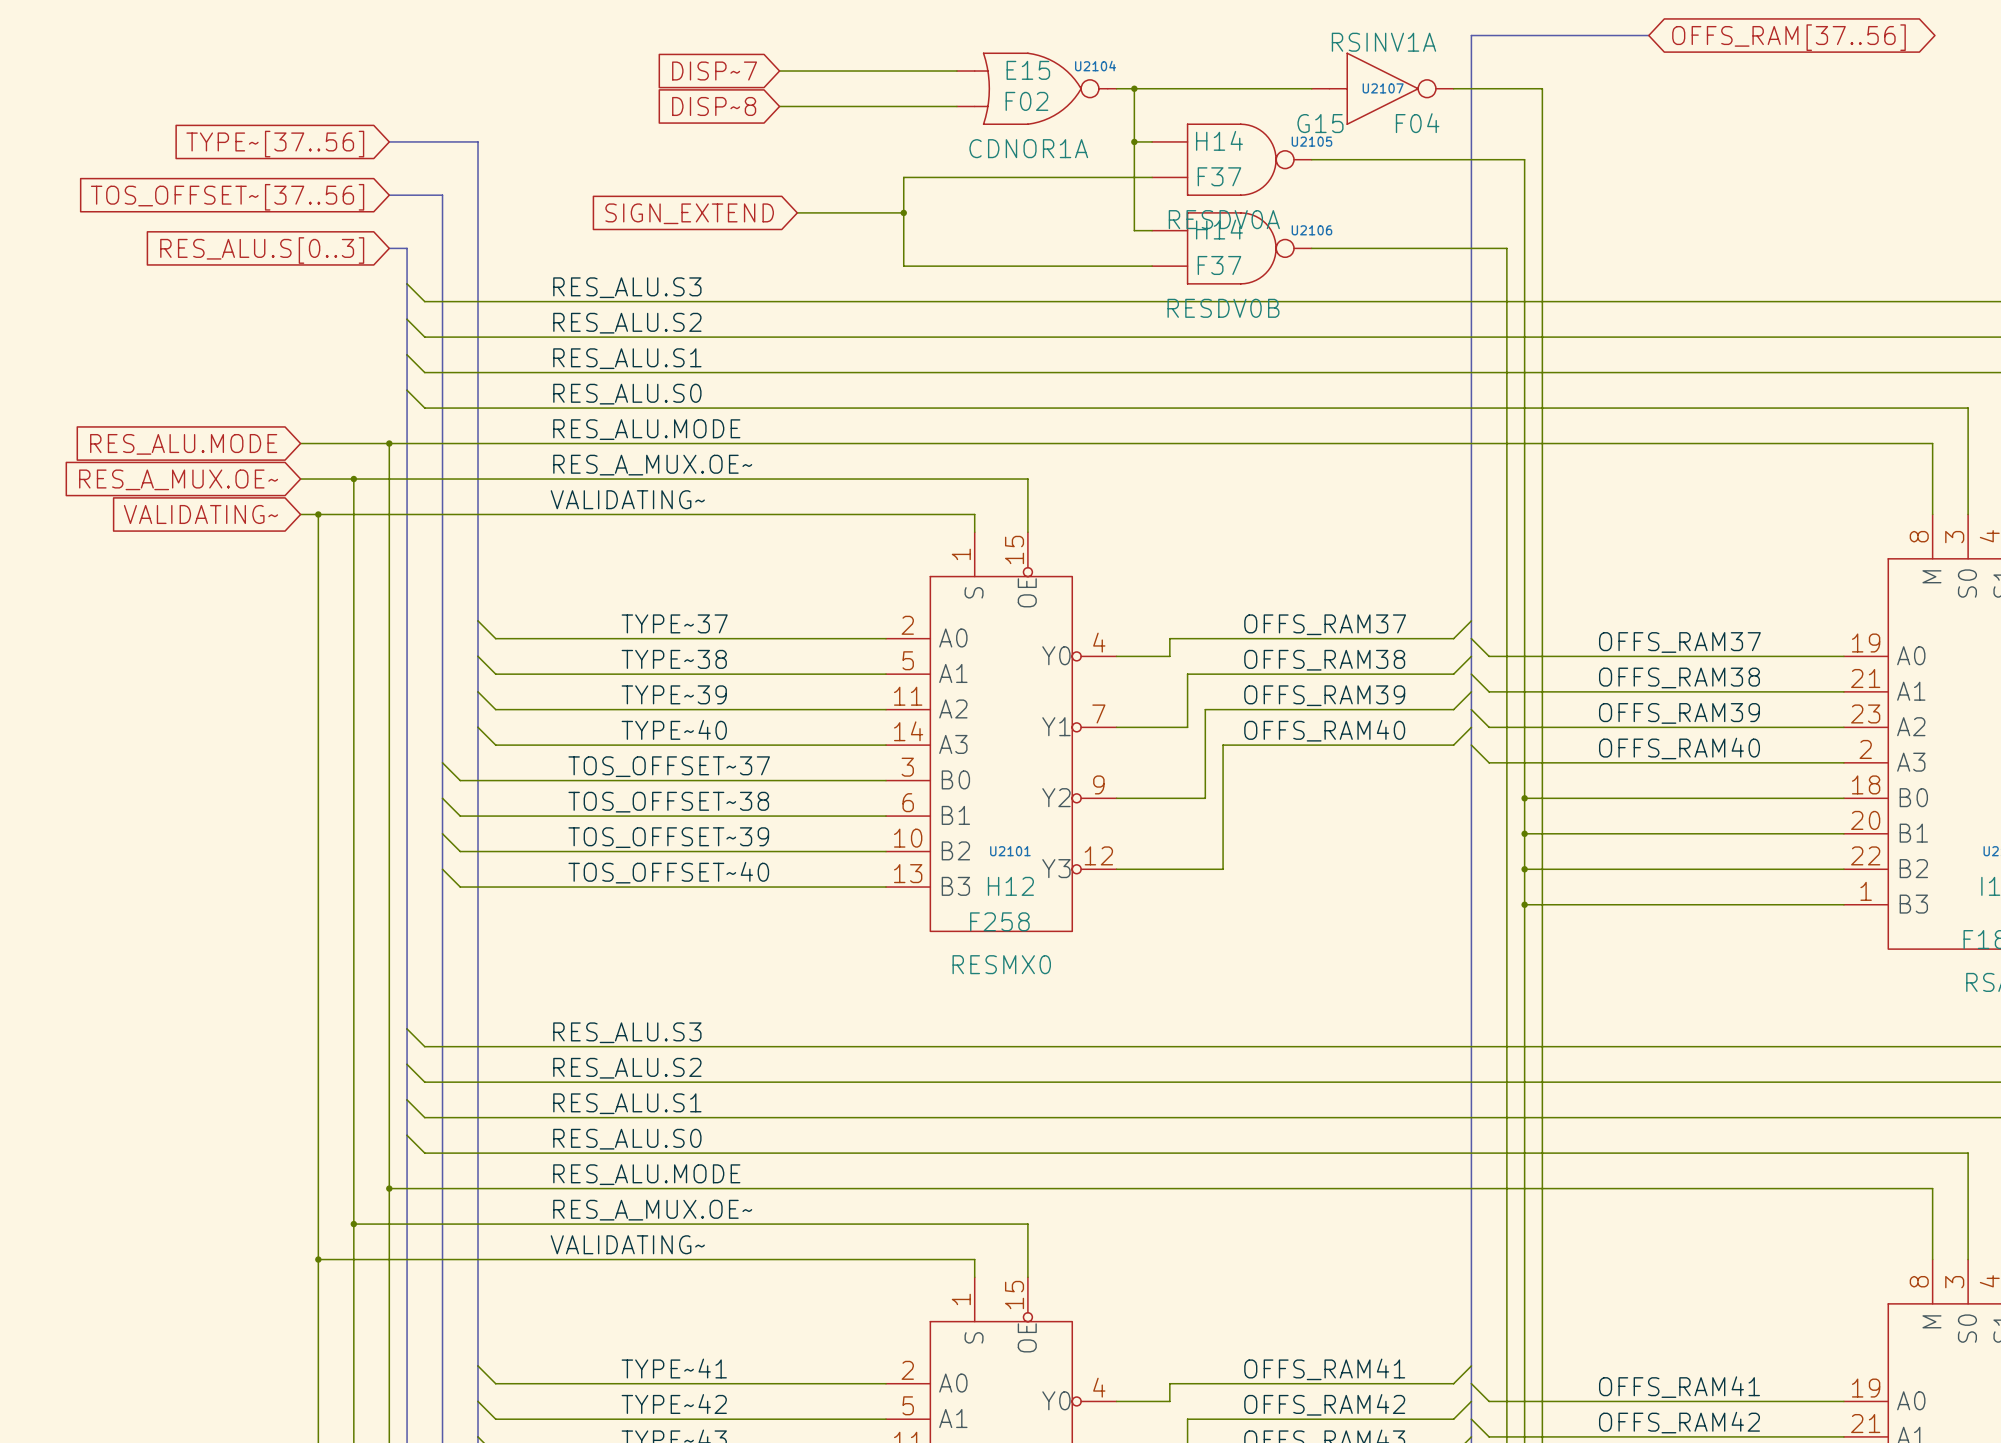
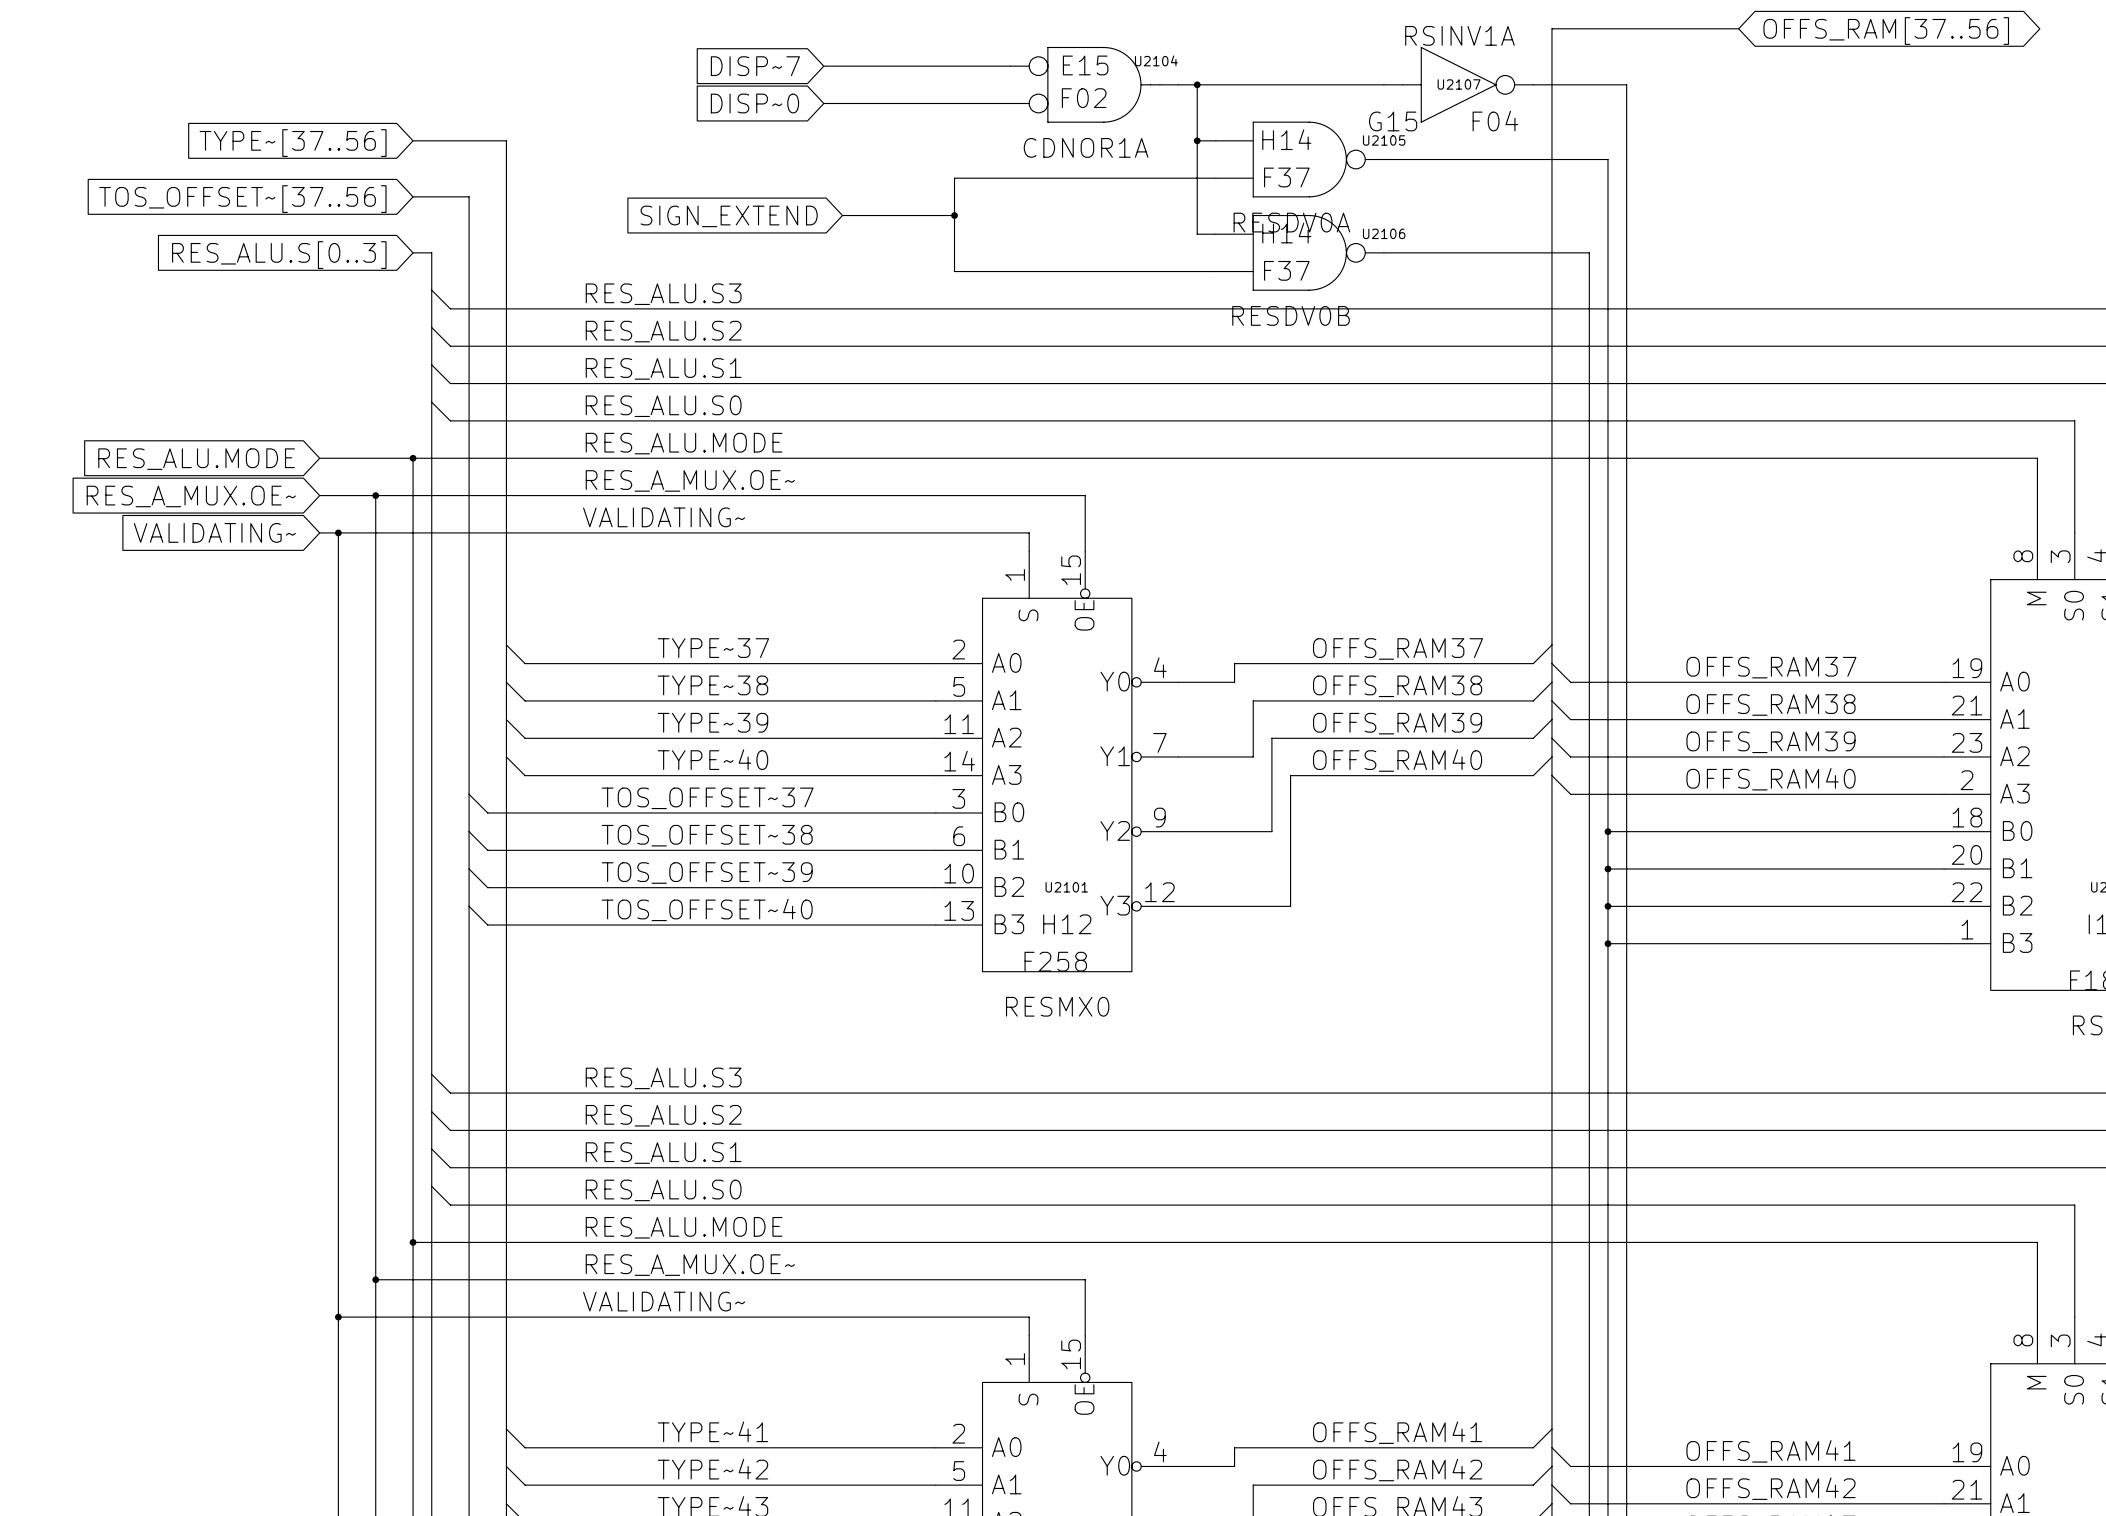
U2104 symbol: [956, 52, 1117, 125] -> [1010, 46, 1179, 123]
global label: DISP~8 (714, 106) -> DISP~0 (754, 103)

